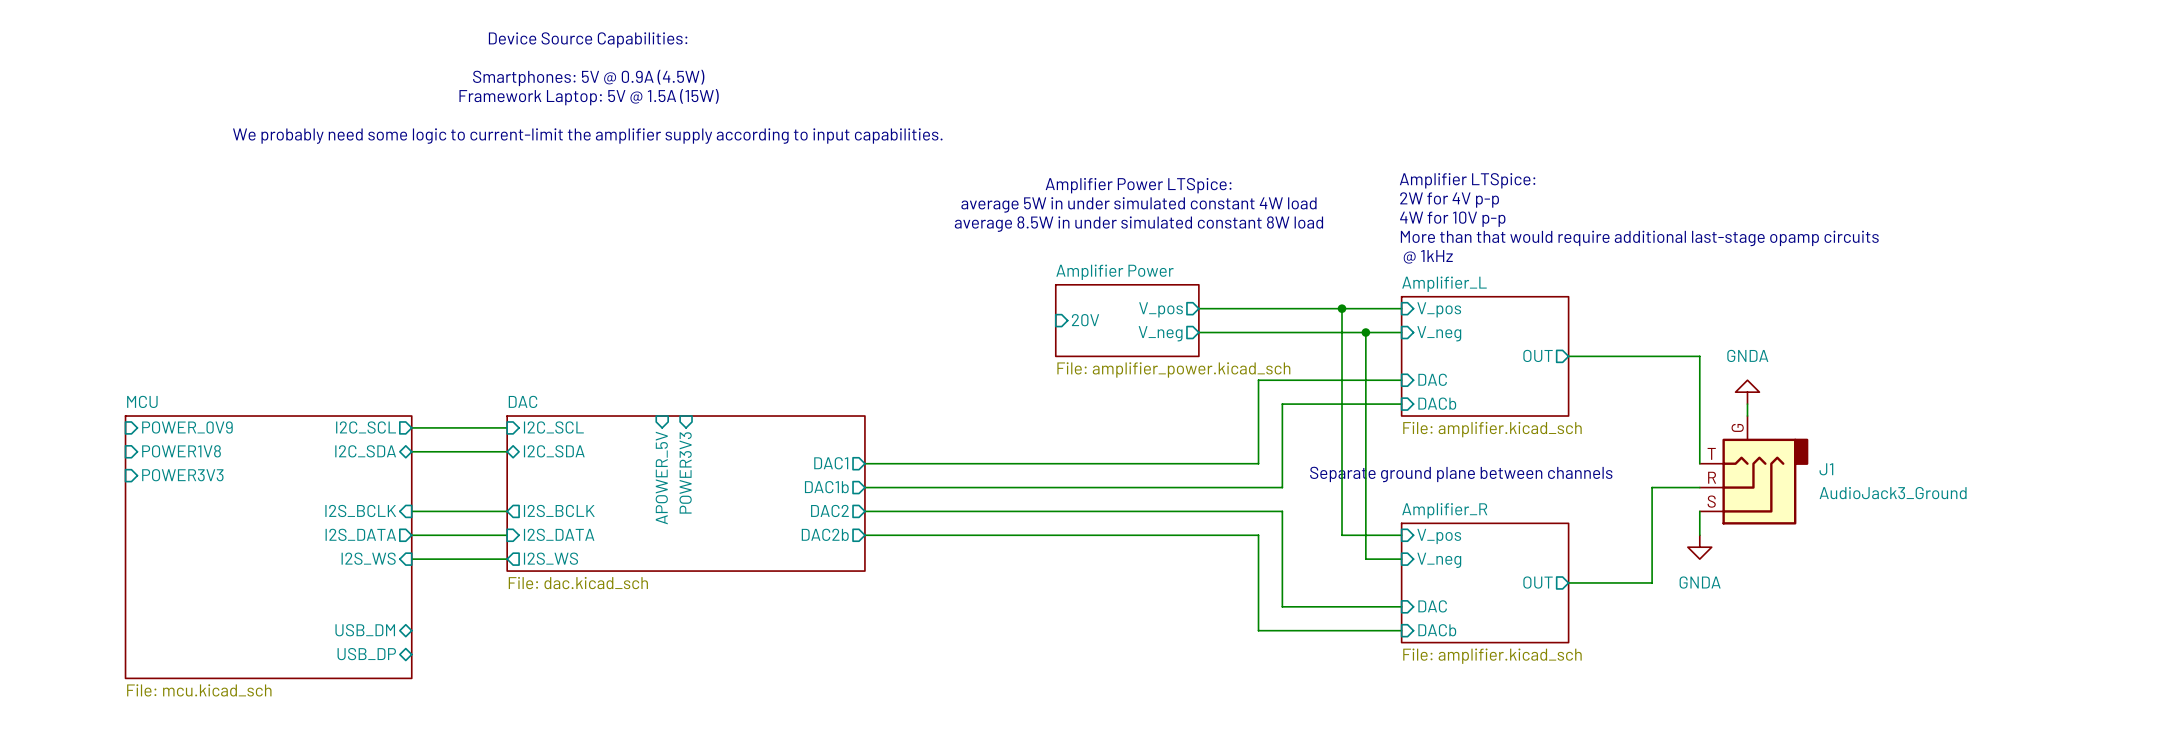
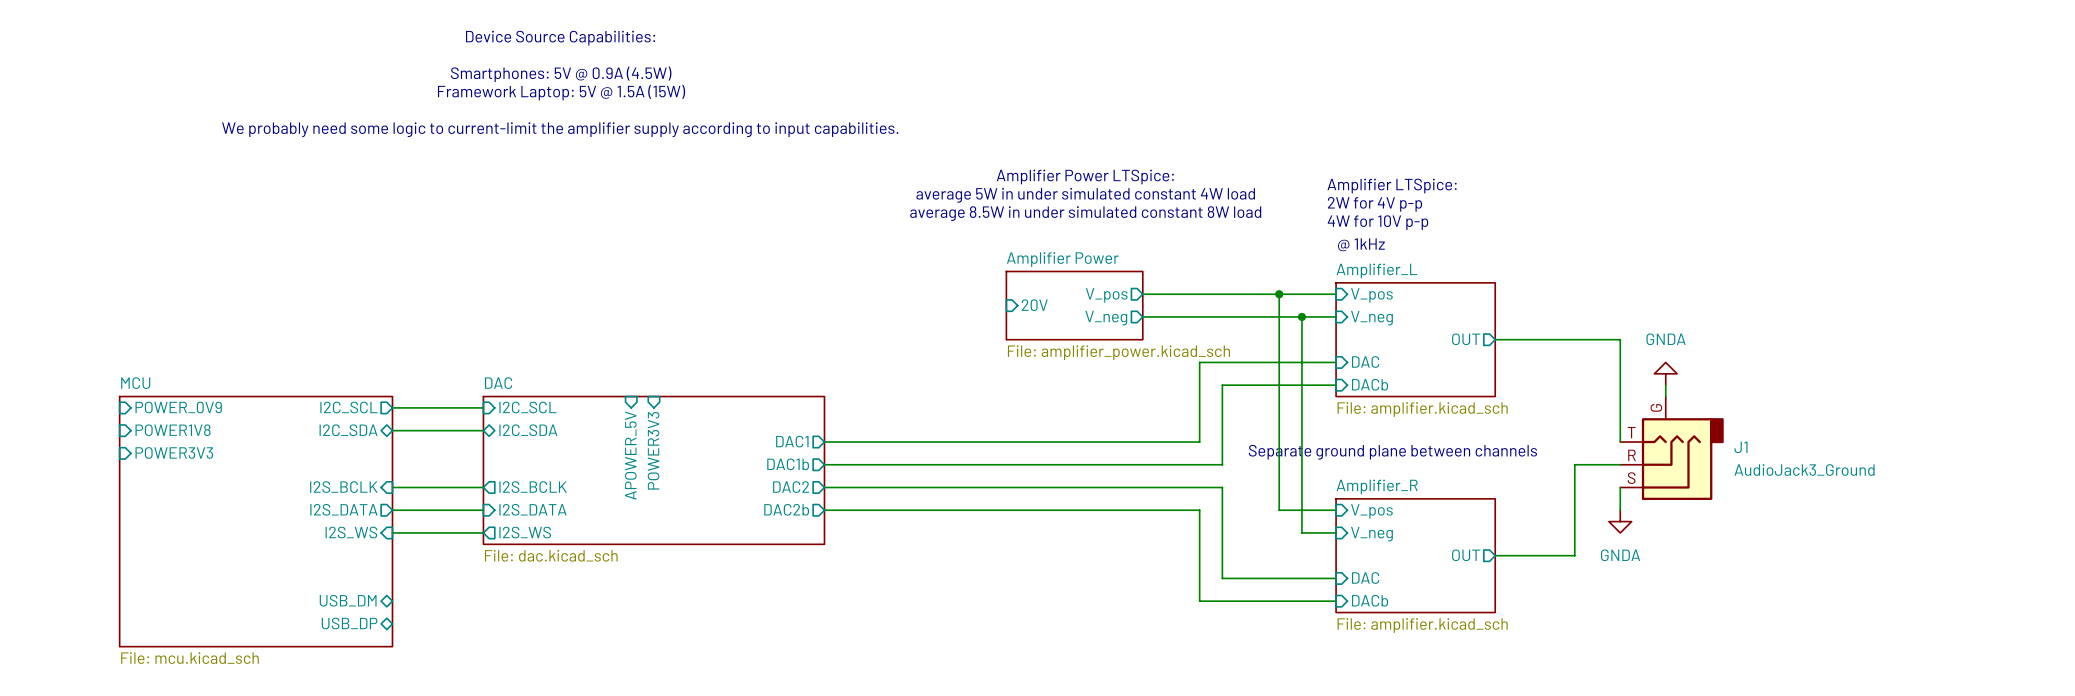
text position: Amplifier LTSpice: (1467, 180) -> Amplifier LTSpice: (1392, 186)
text position: 2W for 4V p-p (1449, 200) -> 2W for 4V p-p (1374, 204)
text position: 4W for 10V p-p (1452, 219) -> 4W for 10V p-p (1377, 222)
text: More than that would require additional last-stage opamp circuits (1639, 238) -> none

